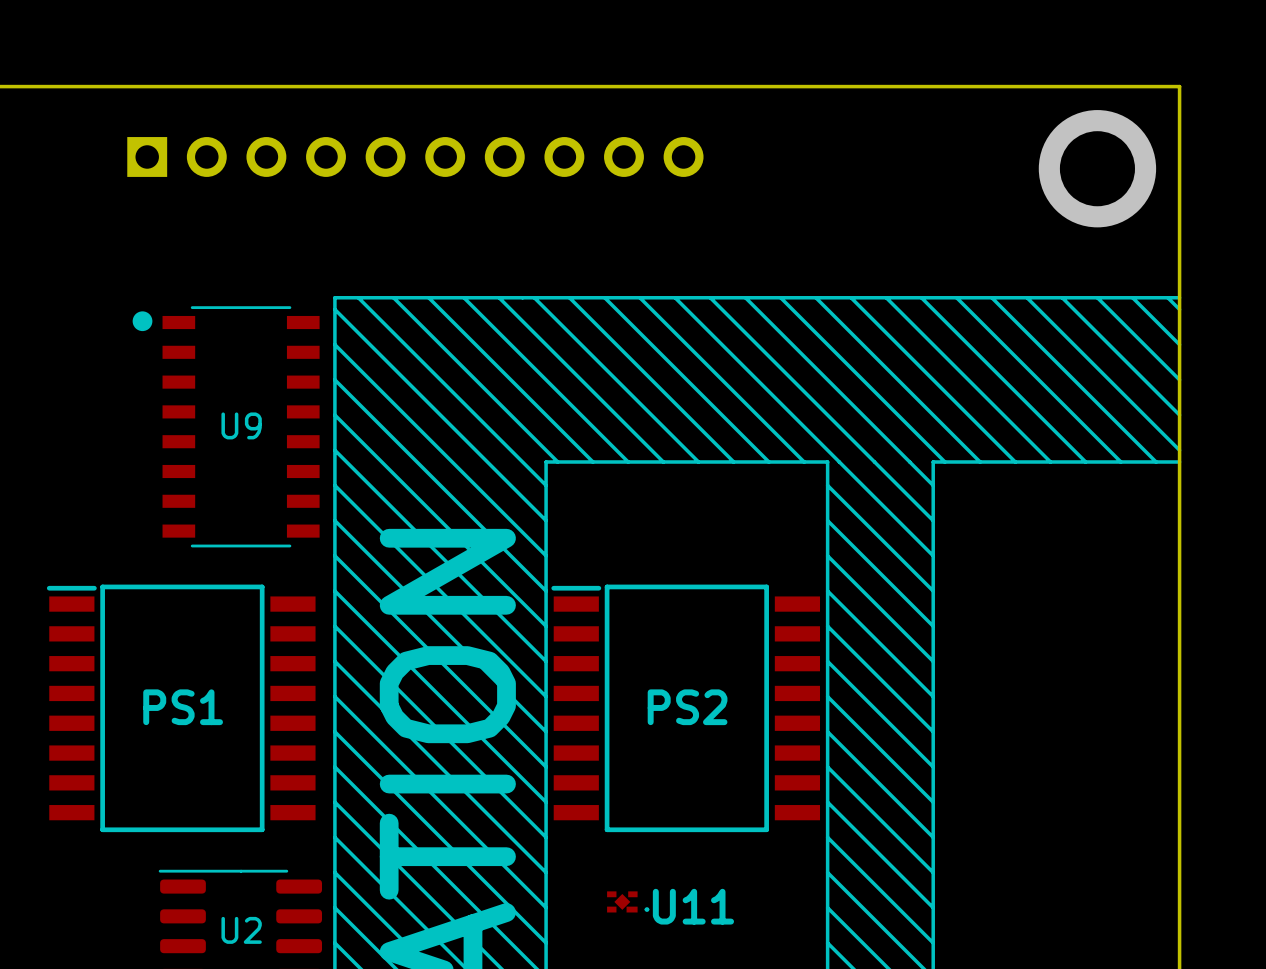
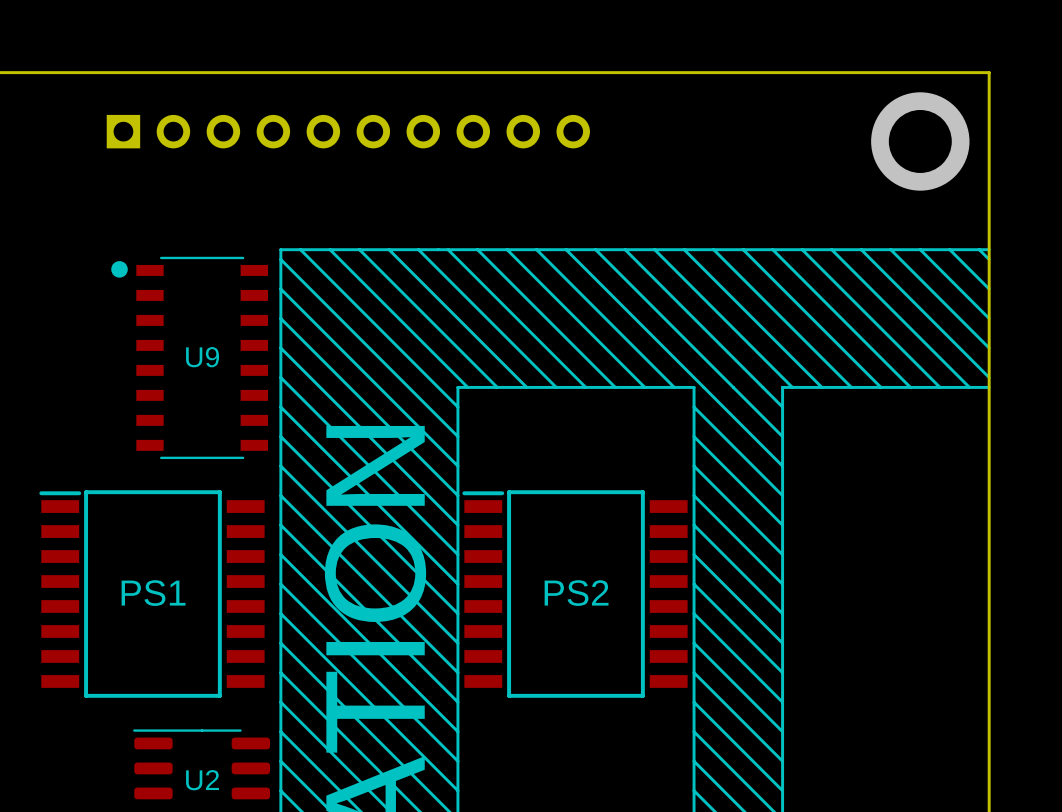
U11: (628, 901) -> none

